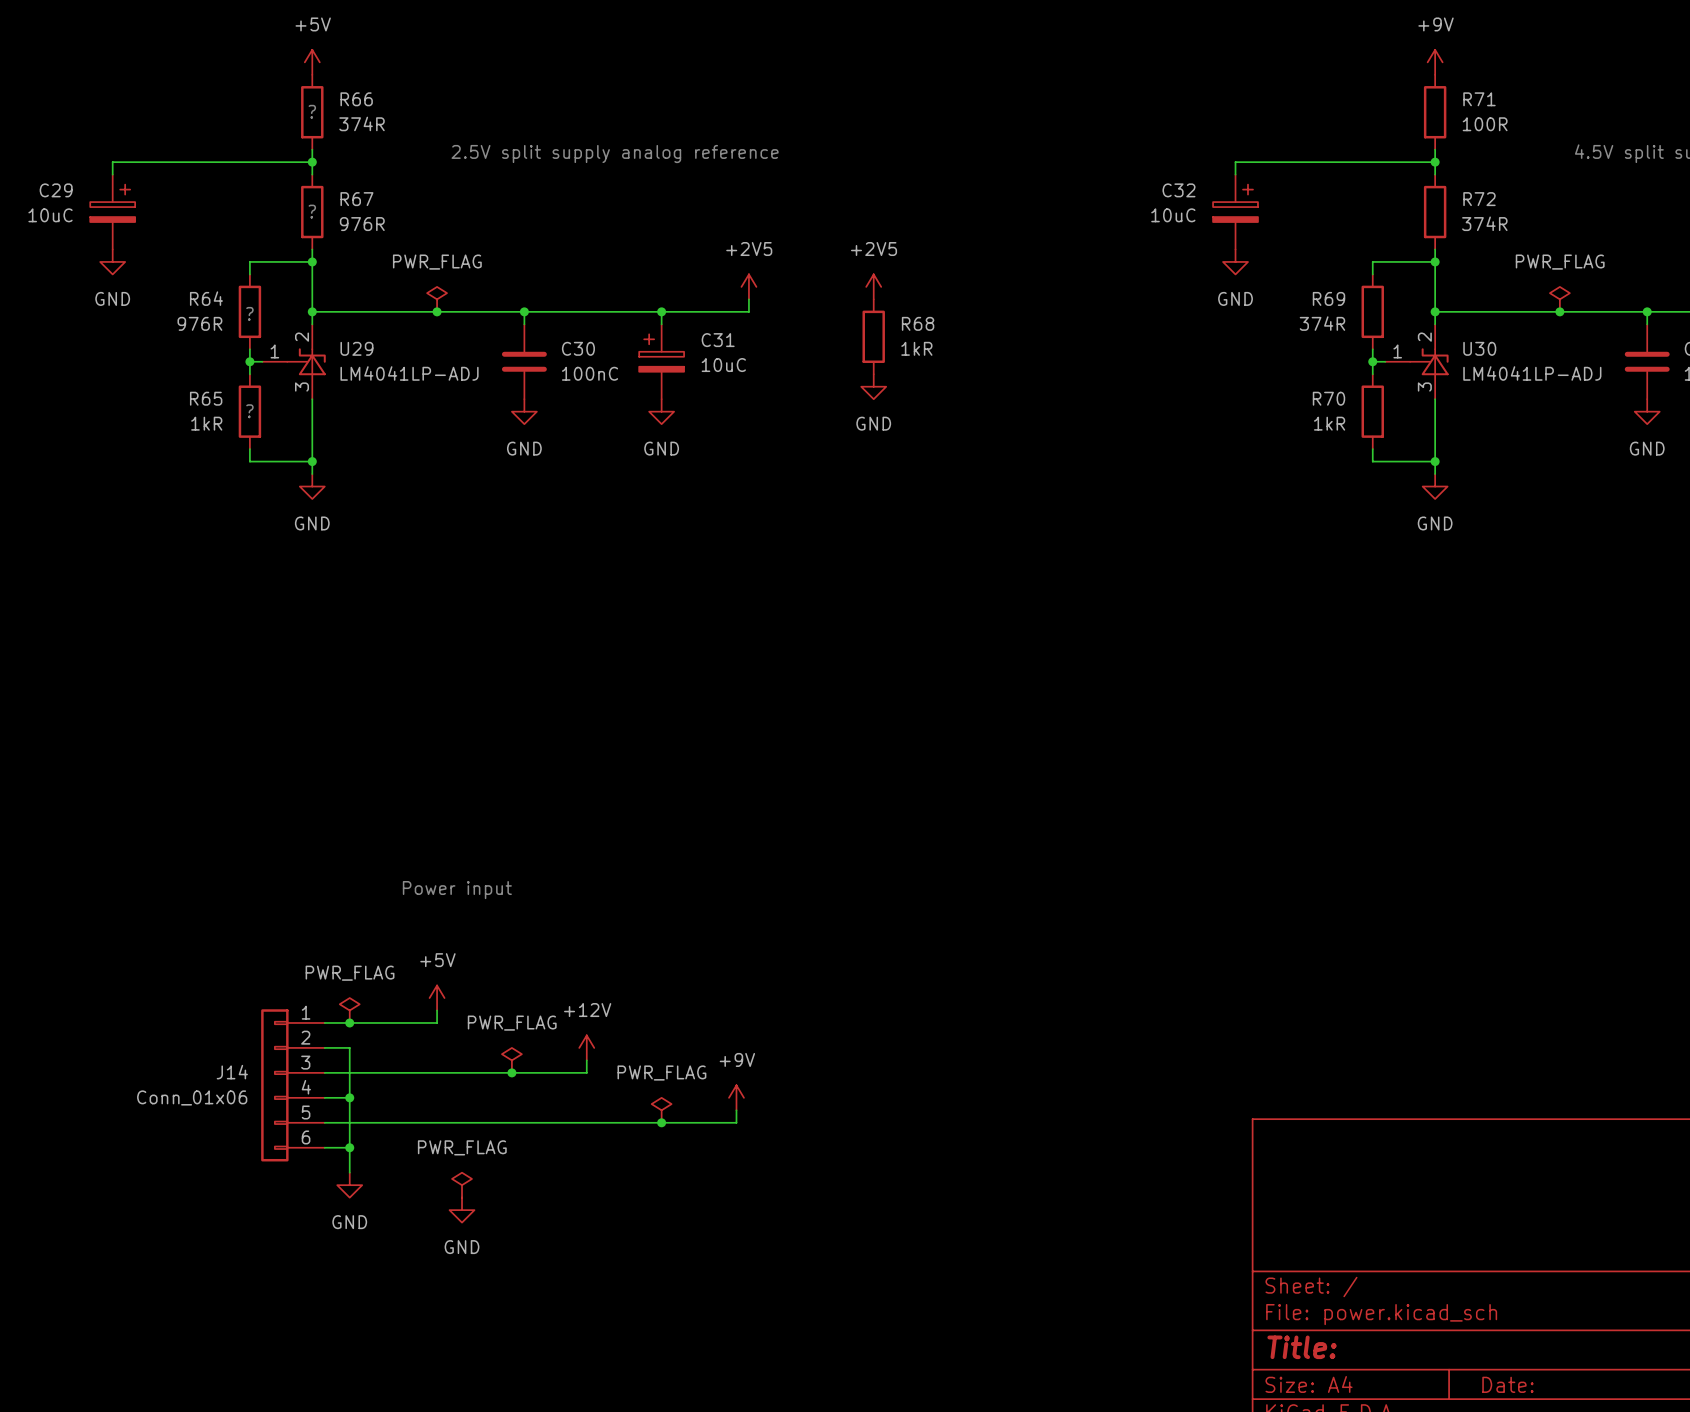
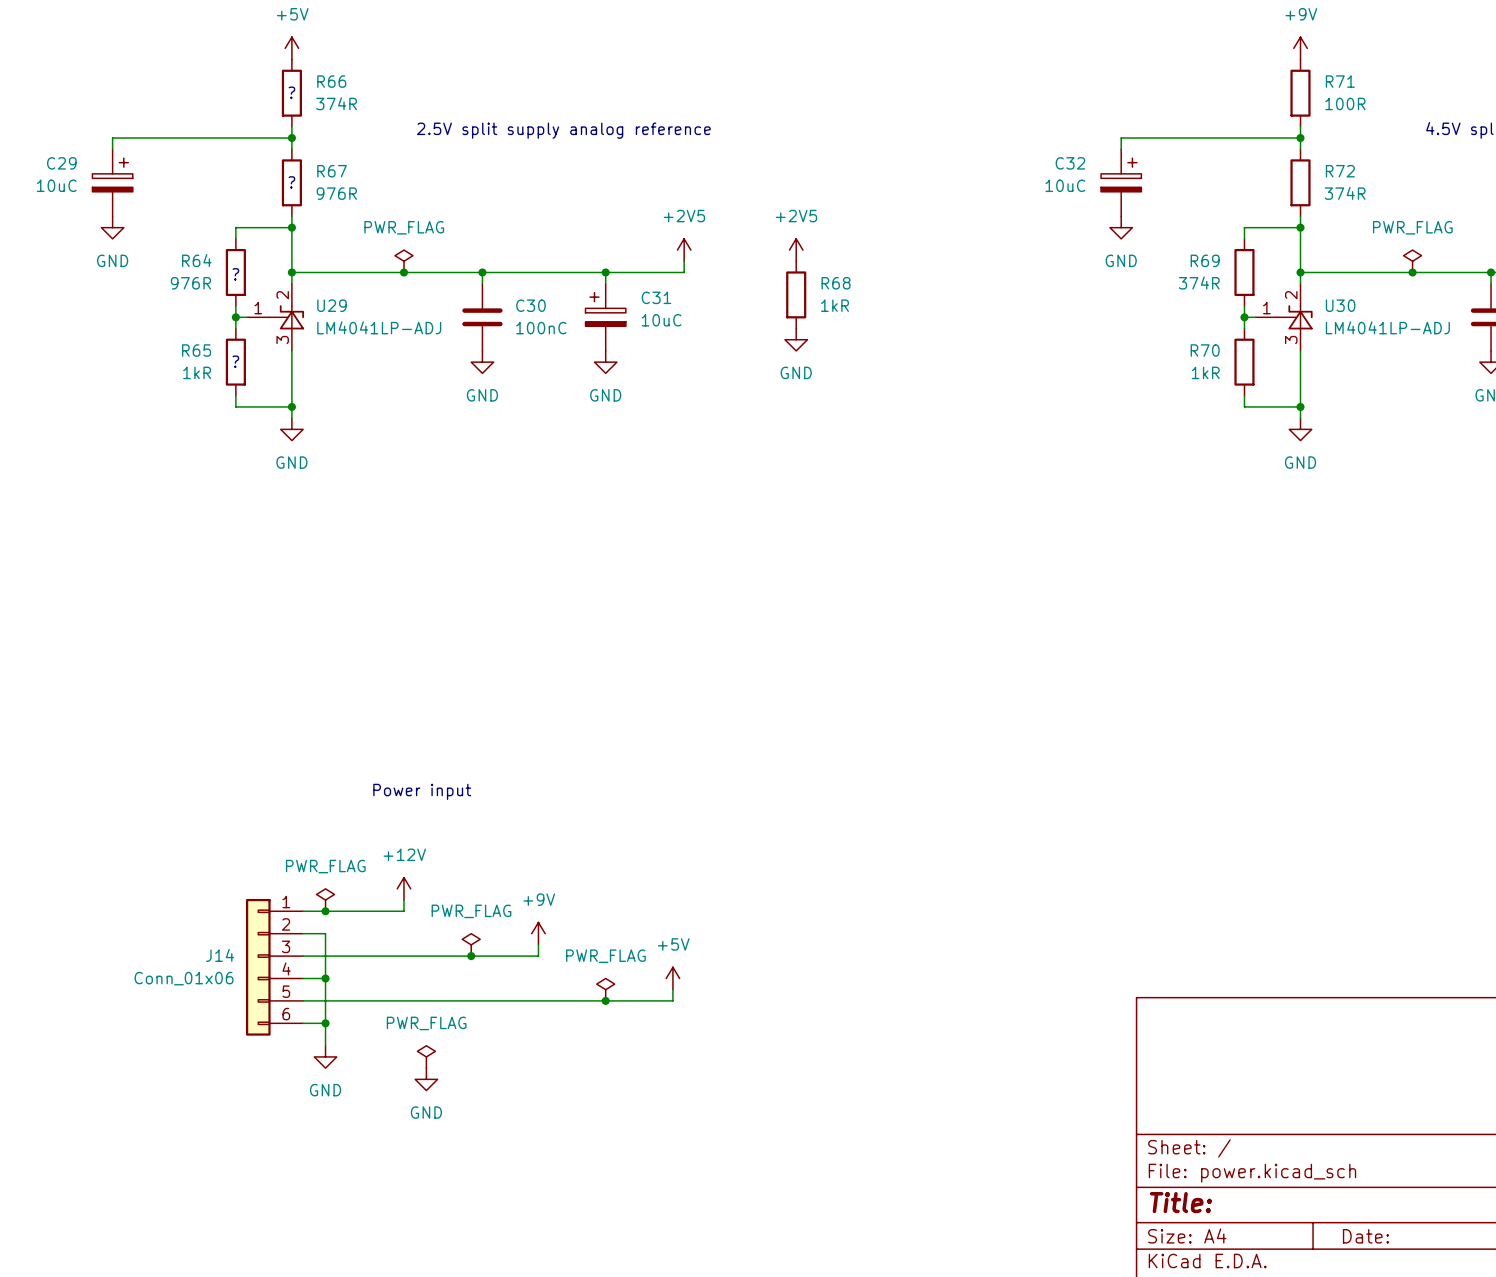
power symbol: +5V (437, 998) -> +12V (403, 888)
power symbol: +12V (586, 1047) -> +9V (538, 933)
power symbol: +9V (736, 1097) -> +5V (672, 978)

